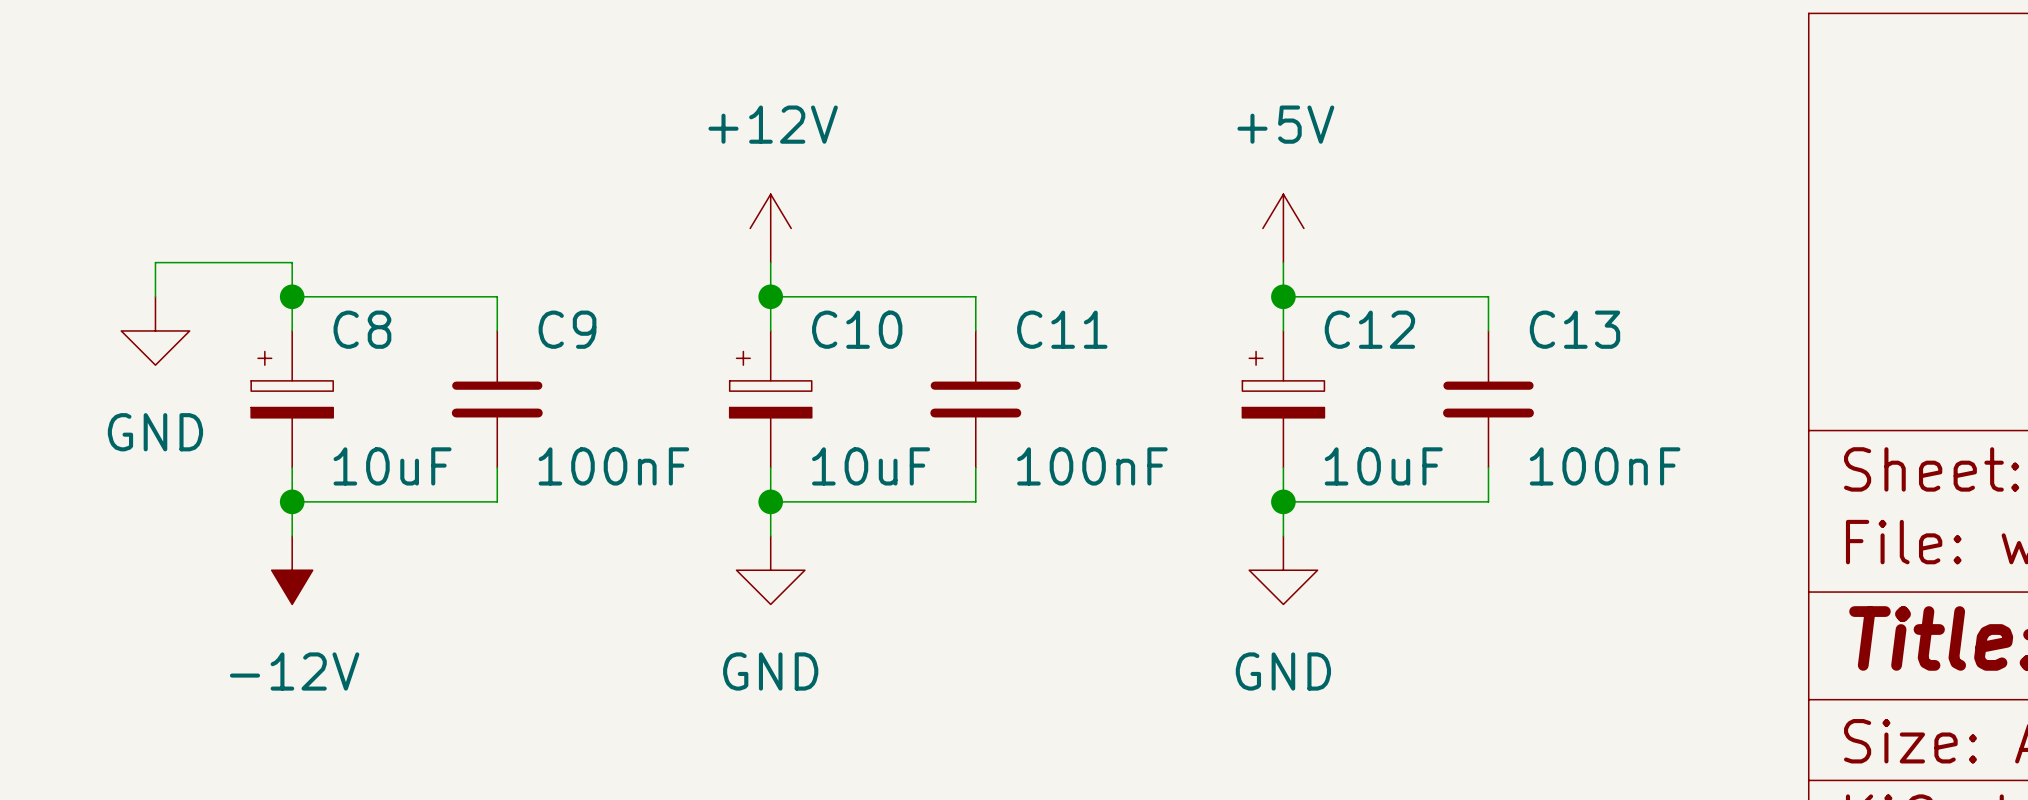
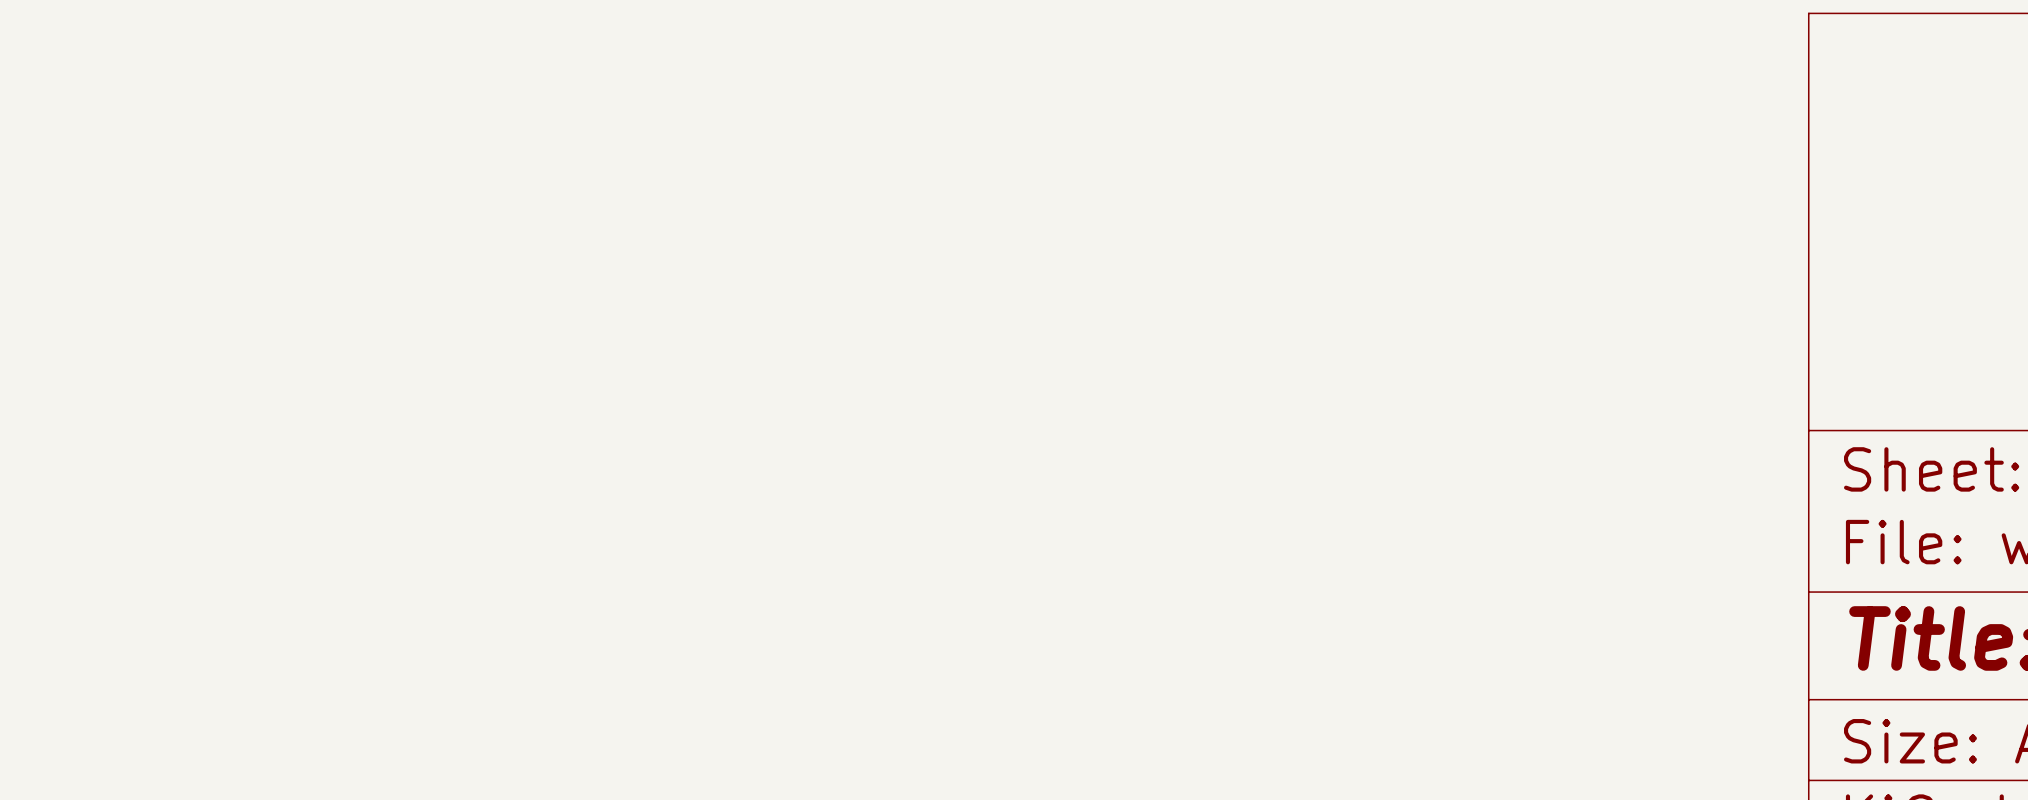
power symbol: +12V (770, 228) -> none
power symbol: +5V (1283, 228) -> none
wire: (770, 262) (770, 330) -> none
wire: (1283, 262) (1283, 330) -> none
wire: (155, 296) (155, 262) (292, 262) (292, 330) -> none
wire: (292, 296) (497, 296) (497, 330) -> none
junction: (292, 296) -> none
wire: (770, 296) (975, 296) (975, 330) -> none
junction: (770, 296) -> none
wire: (1283, 296) (1488, 296) (1488, 330) -> none
junction: (1283, 296) -> none
power symbol: GND (155, 330) -> none
C8: 10uF (292, 399) -> none
C9: 100nF (497, 399) -> none
C10: 10uF (770, 399) -> none
C11: 100nF (975, 399) -> none
C12: 10uF (1283, 399) -> none
C13: 100nF (1488, 399) -> none
wire: (292, 467) (292, 536) -> none
wire: (497, 467) (497, 501) (292, 501) -> none
wire: (770, 467) (770, 536) -> none
wire: (975, 467) (975, 501) (770, 501) -> none
wire: (1283, 467) (1283, 536) -> none
wire: (1488, 467) (1488, 501) (1283, 501) -> none
junction: (292, 501) -> none
junction: (770, 501) -> none
junction: (1283, 501) -> none
power symbol: -12V (292, 570) -> none
power symbol: GND (770, 570) -> none
power symbol: GND (1283, 570) -> none

